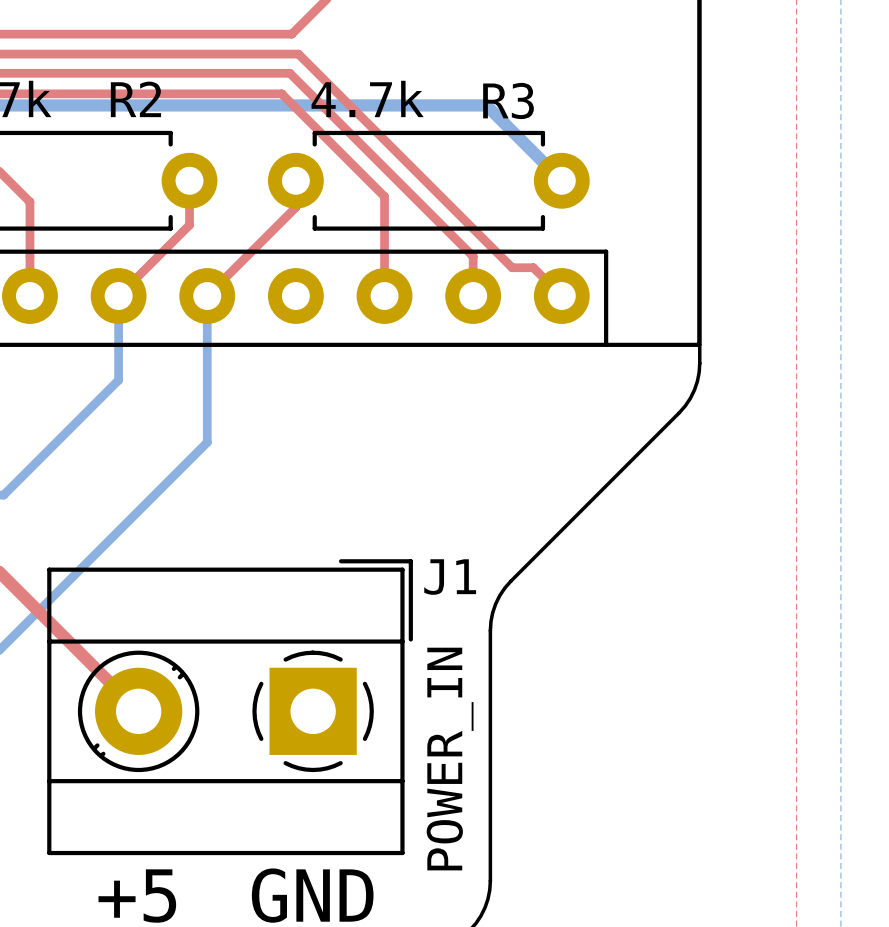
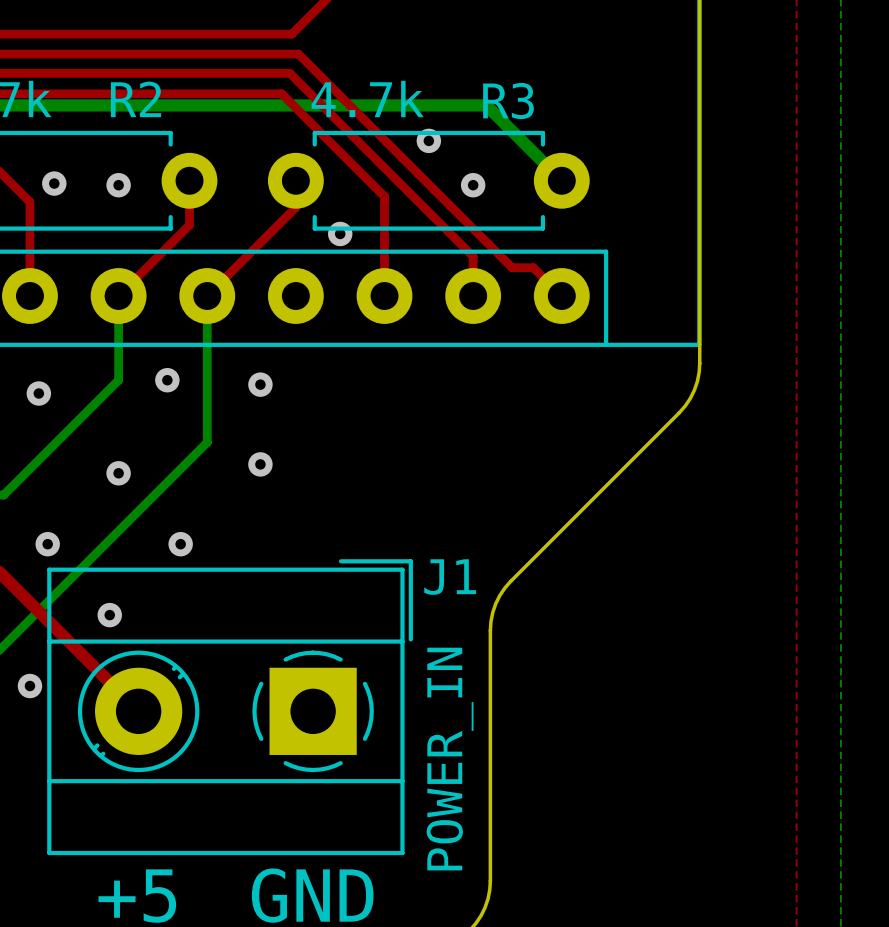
via: none -> (428, 140)
via: none -> (54, 183)
via: none -> (118, 185)
via: none -> (473, 185)
via: none -> (340, 233)
via: none -> (167, 380)
via: none -> (260, 384)
via: none -> (38, 393)
via: none -> (260, 464)
via: none -> (118, 473)
via: none -> (47, 544)
via: none -> (180, 544)
via: none -> (109, 615)
via: none -> (29, 686)

